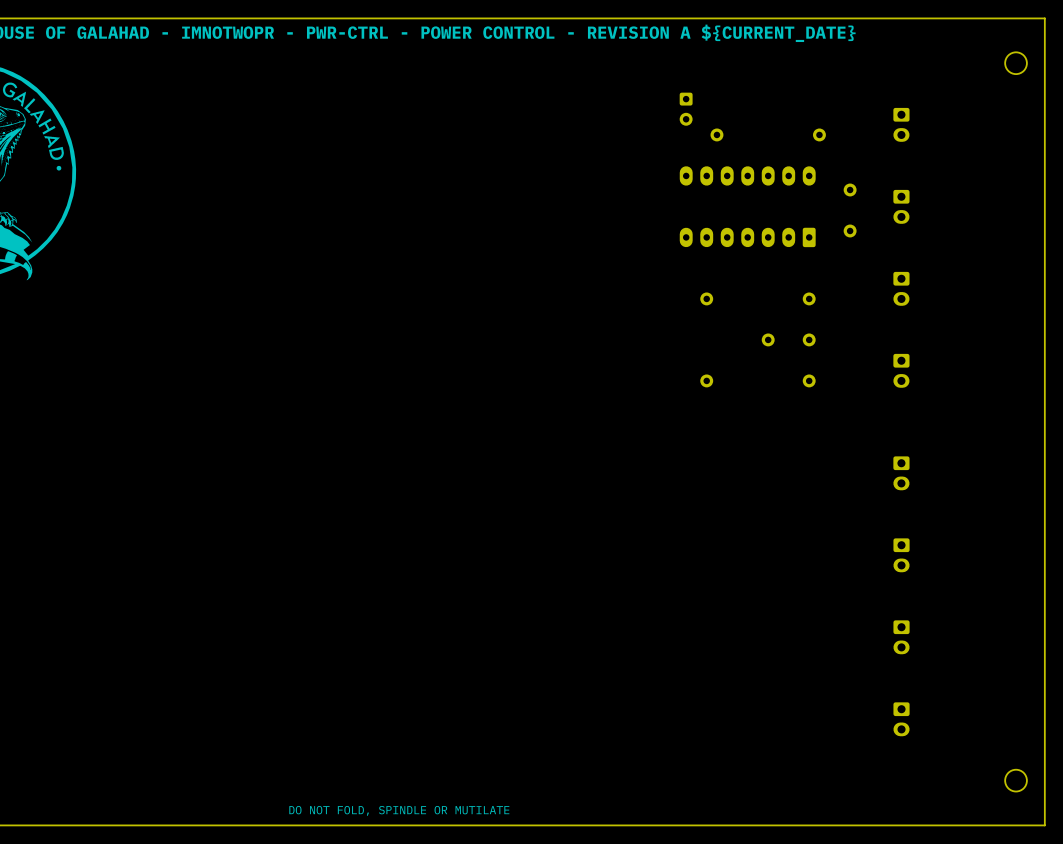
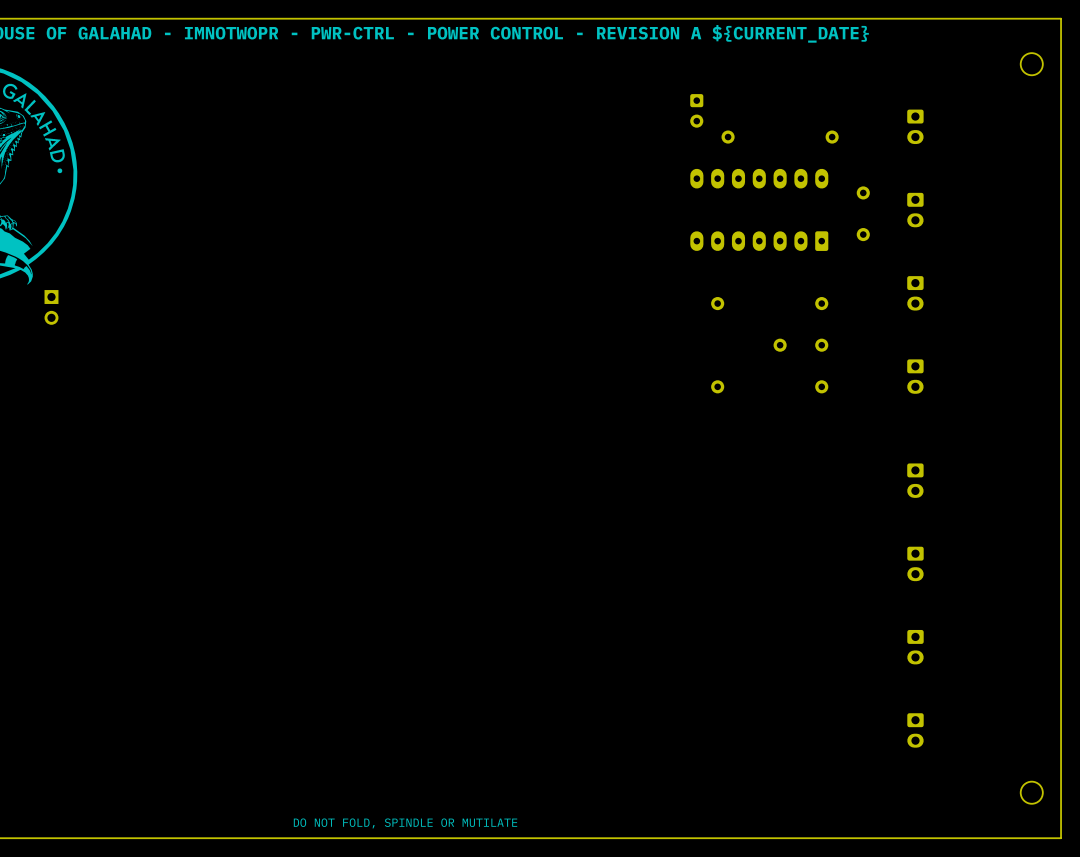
part: none -> (51, 307)

